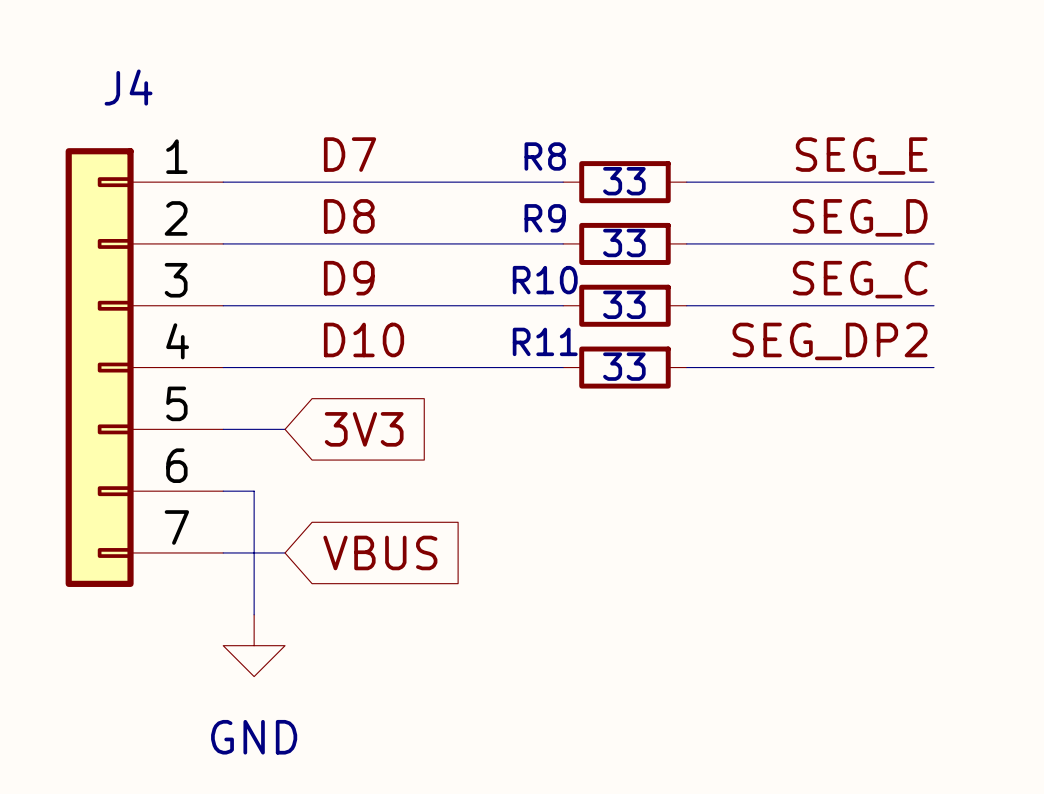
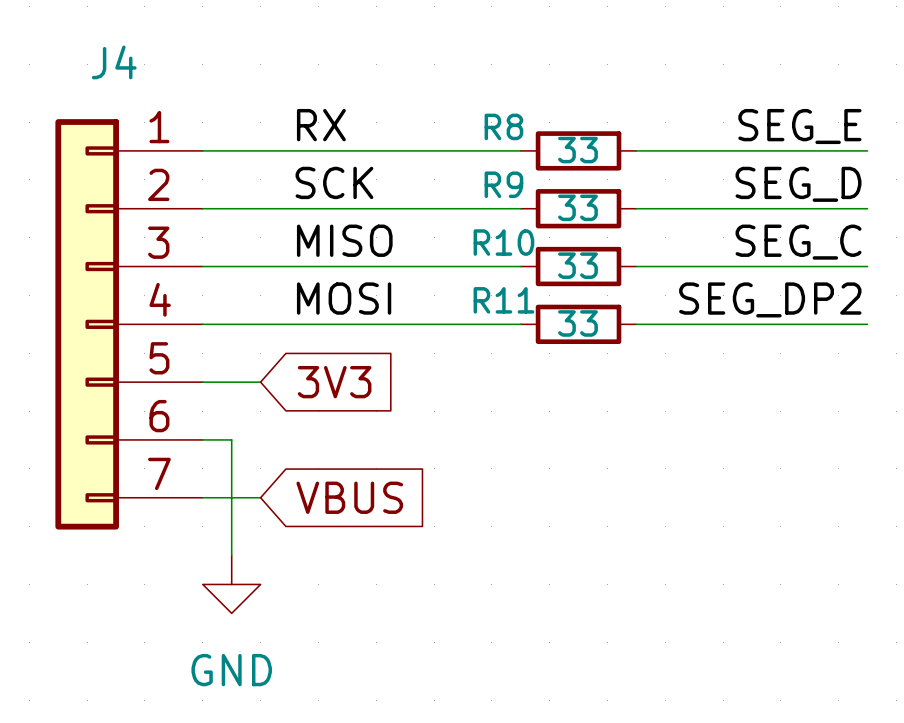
label: D7 (350, 154) -> RX (321, 125)
label: D8 (349, 216) -> SCK (334, 182)
label: D9 (349, 278) -> MISO (344, 240)
label: D10 (364, 339) -> MOSI (344, 298)

